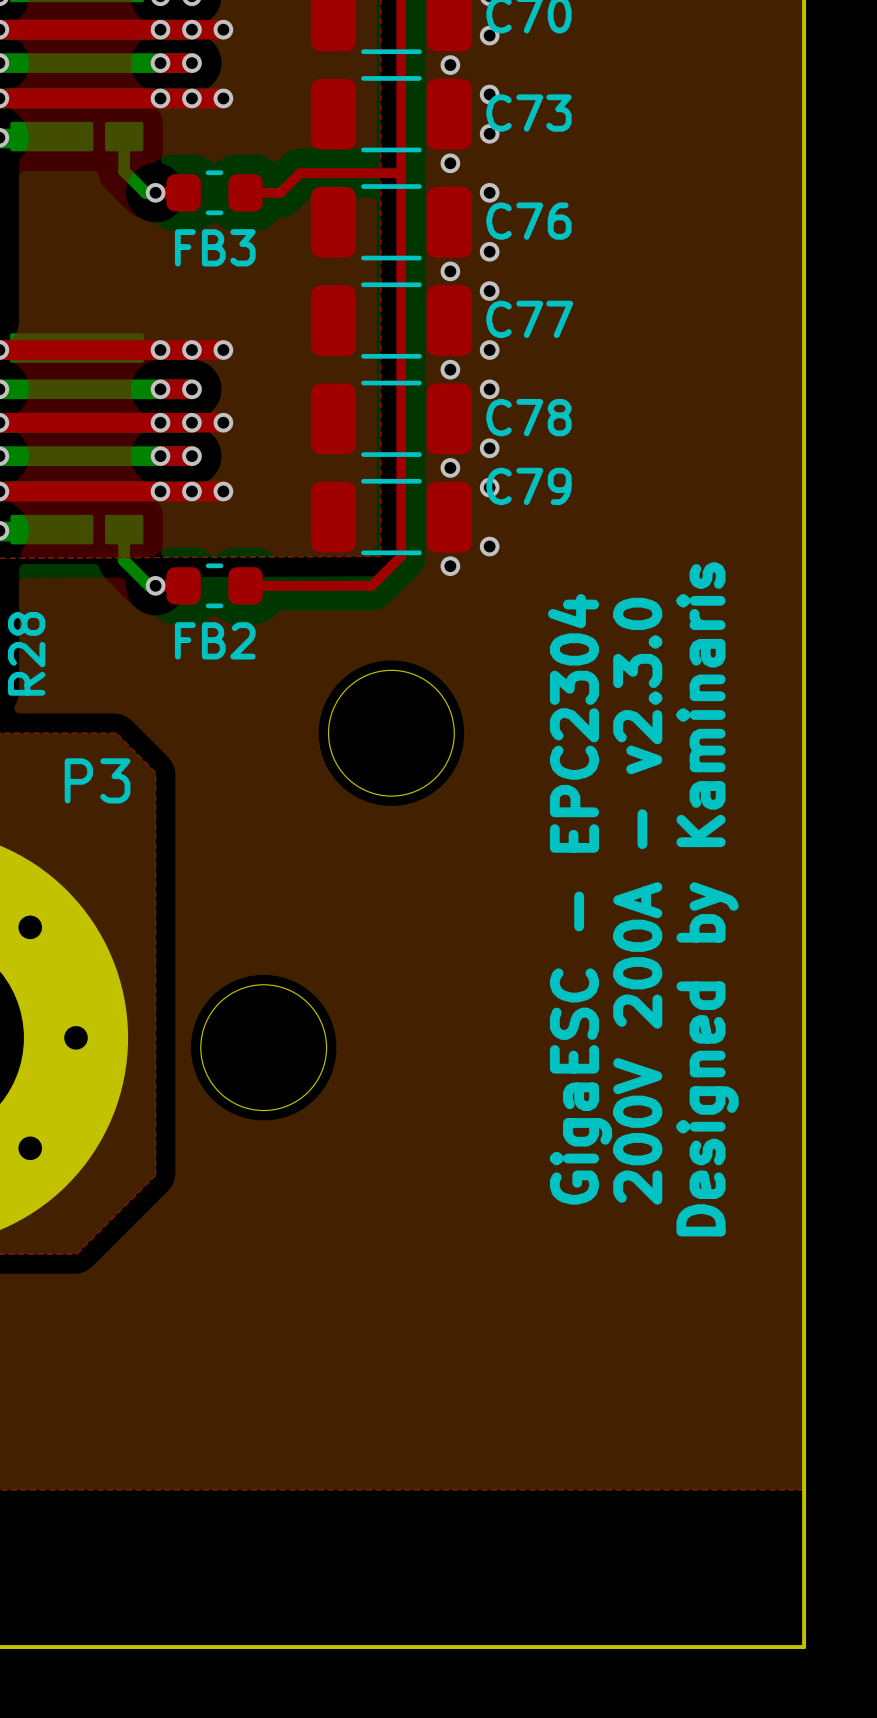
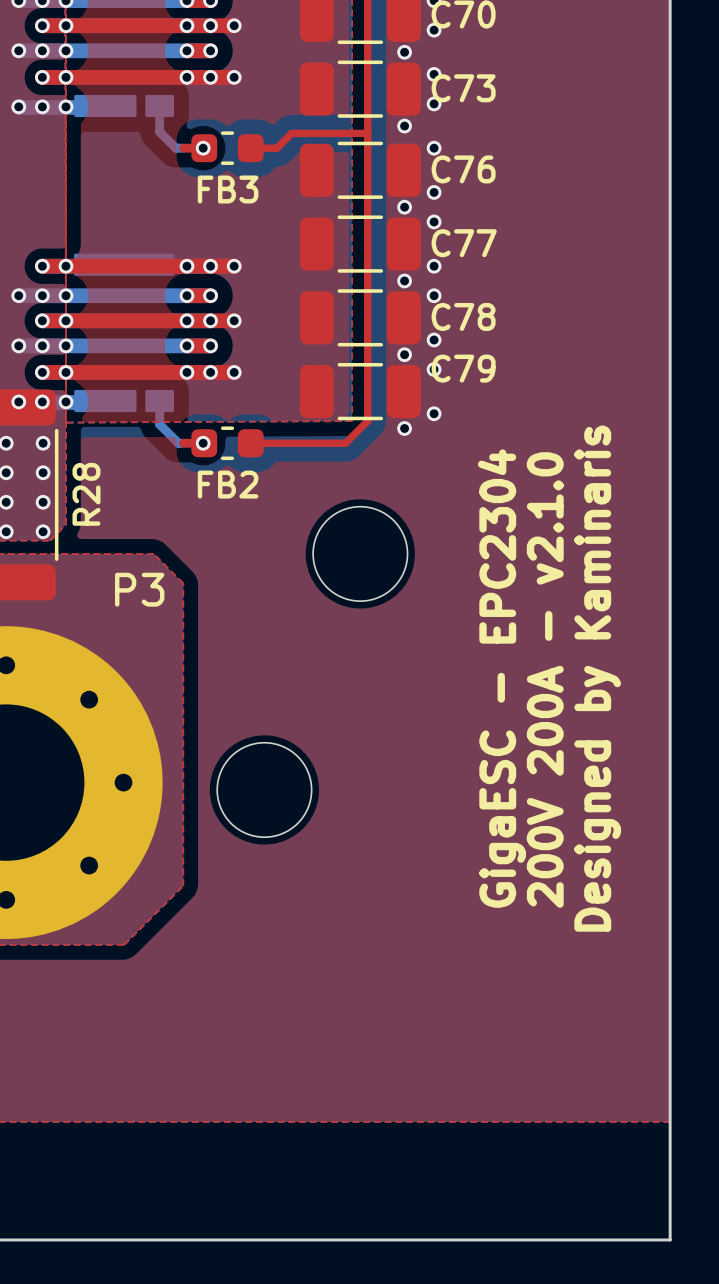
via position: (155, 192) -> (203, 148)
via position: (155, 585) -> (203, 443)
text: 200V 200A - v2.3.0 (637, 901) -> 200V 200A - v2.1.0 (545, 680)

